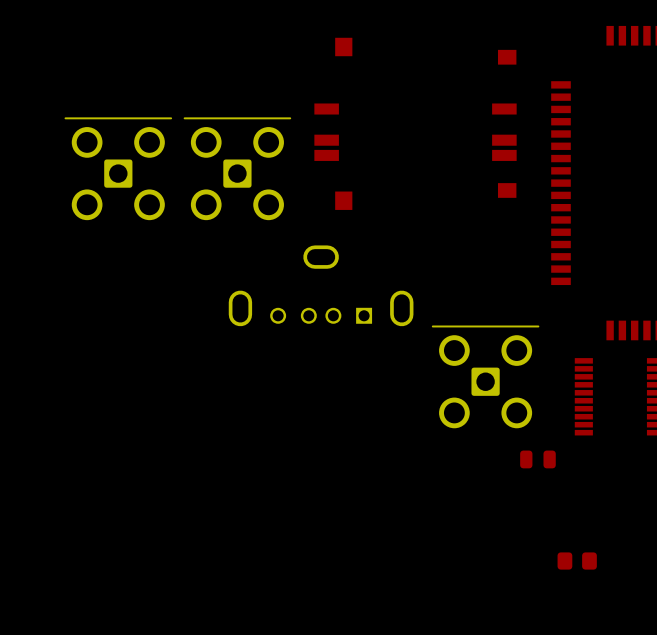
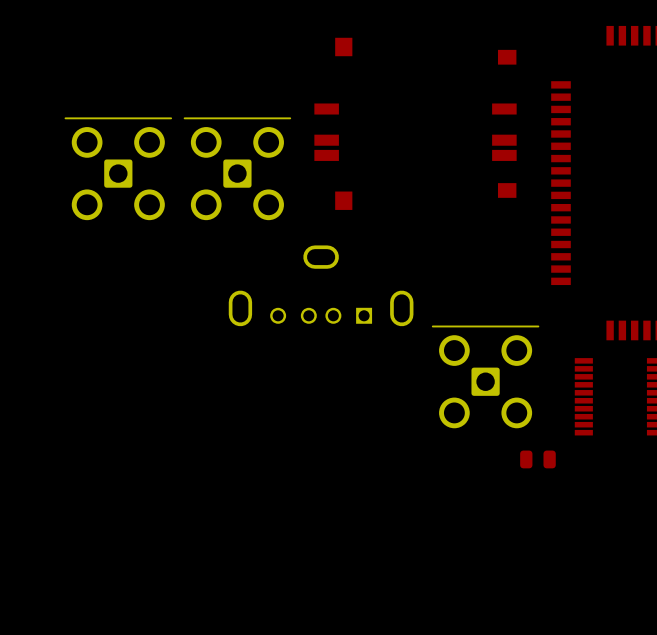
part: (577, 561) -> none

